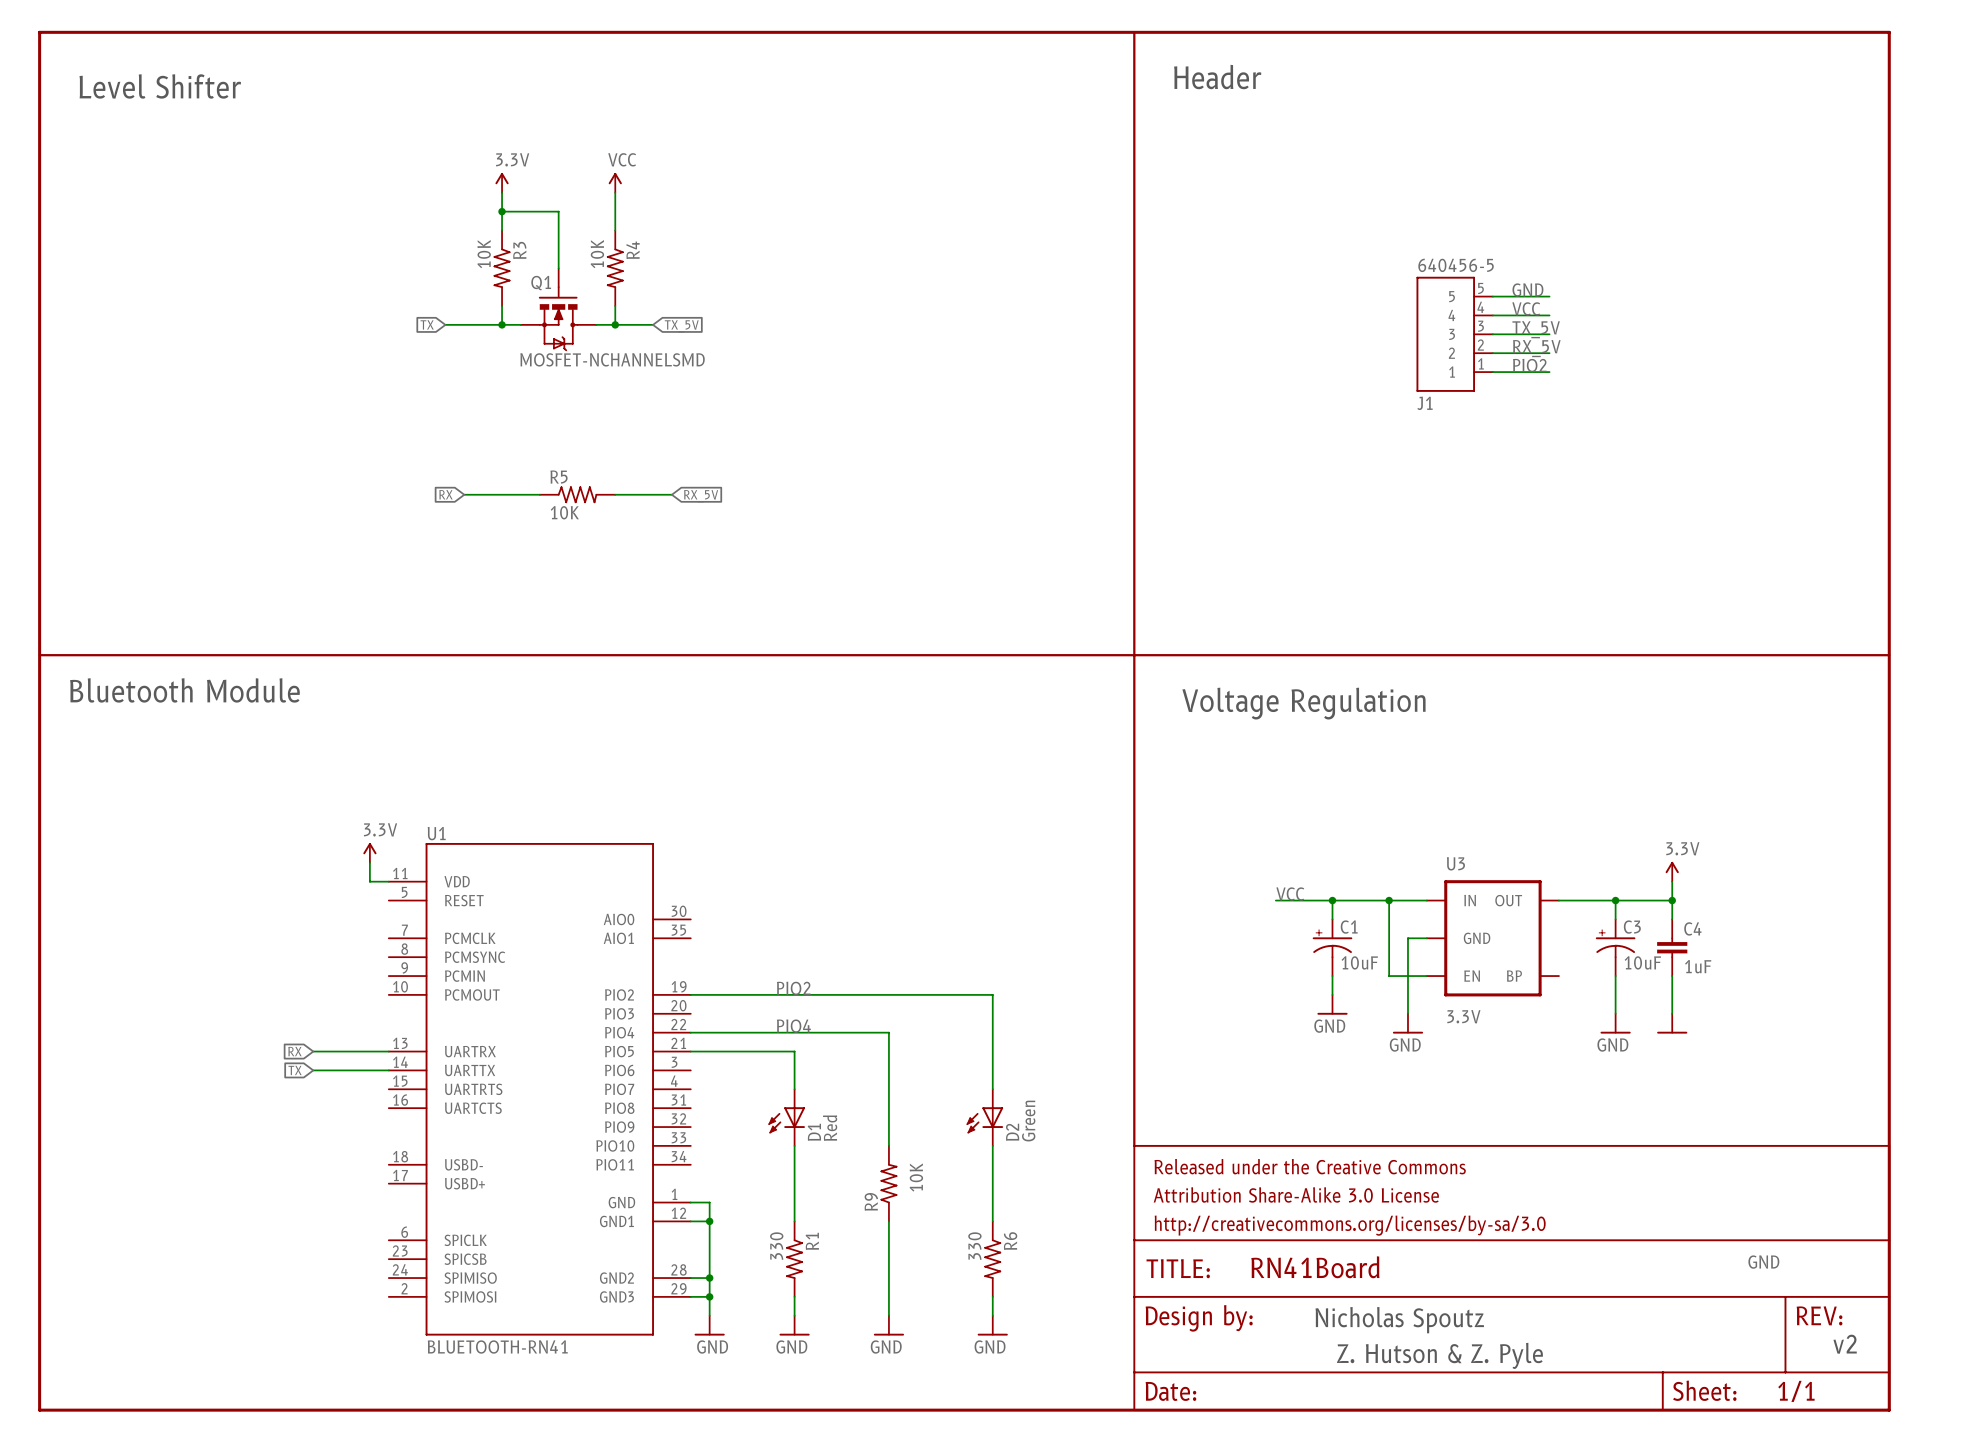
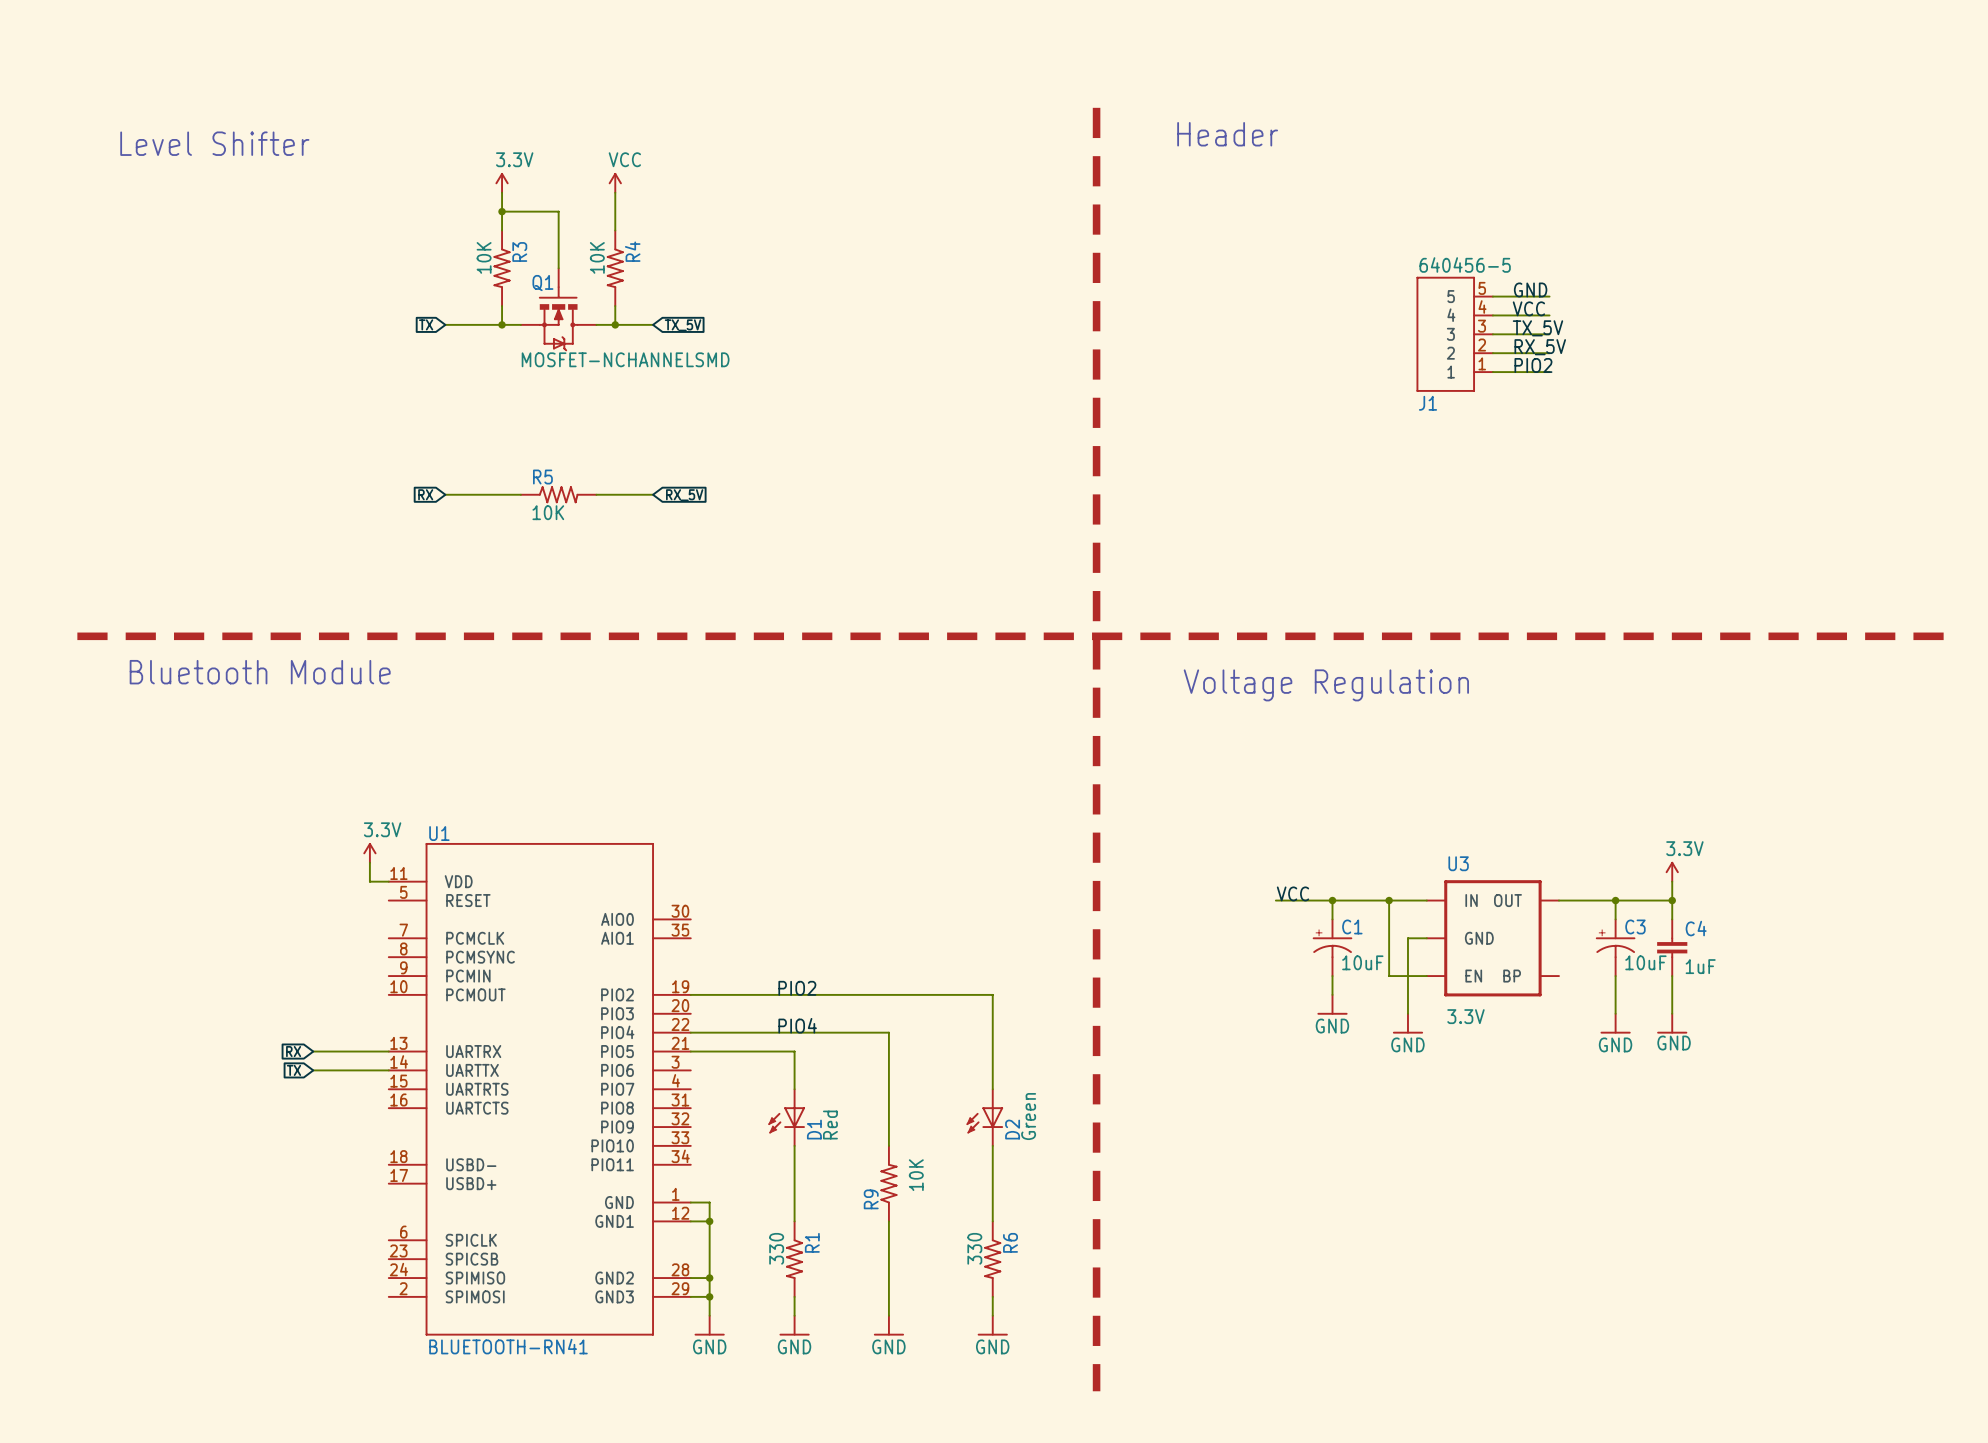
line: (1134, 32) (1134, 1145) -> none
text position: Header (1217, 77) -> Header (1227, 134)
text position: Level Shifter (160, 86) -> Level Shifter (214, 143)
line: none -> (1096, 107) (1096, 1391)
global label position: RX (445, 494) -> RX (425, 494)
R5 position: (577, 494) -> (558, 494)
global label position: RX_5V (701, 496) -> RX_5V (684, 495)
line: none -> (77, 636) (1945, 636)
line: (39, 655) (1889, 655) -> none
text position: Bluetooth Module (184, 690) -> Bluetooth Module (260, 672)
text position: Voltage Regulation (1303, 703) -> Voltage Regulation (1326, 685)
part: (964, 721) -> none
power symbol text position: GND (1763, 1262) -> GND (1674, 1043)
part: (1511, 1278) -> none
text: Nicholas Spoutz (1399, 1320) -> none
text: v2 (1845, 1344) -> none
text: Z. Hutson & Z. Pyle (1439, 1355) -> none

